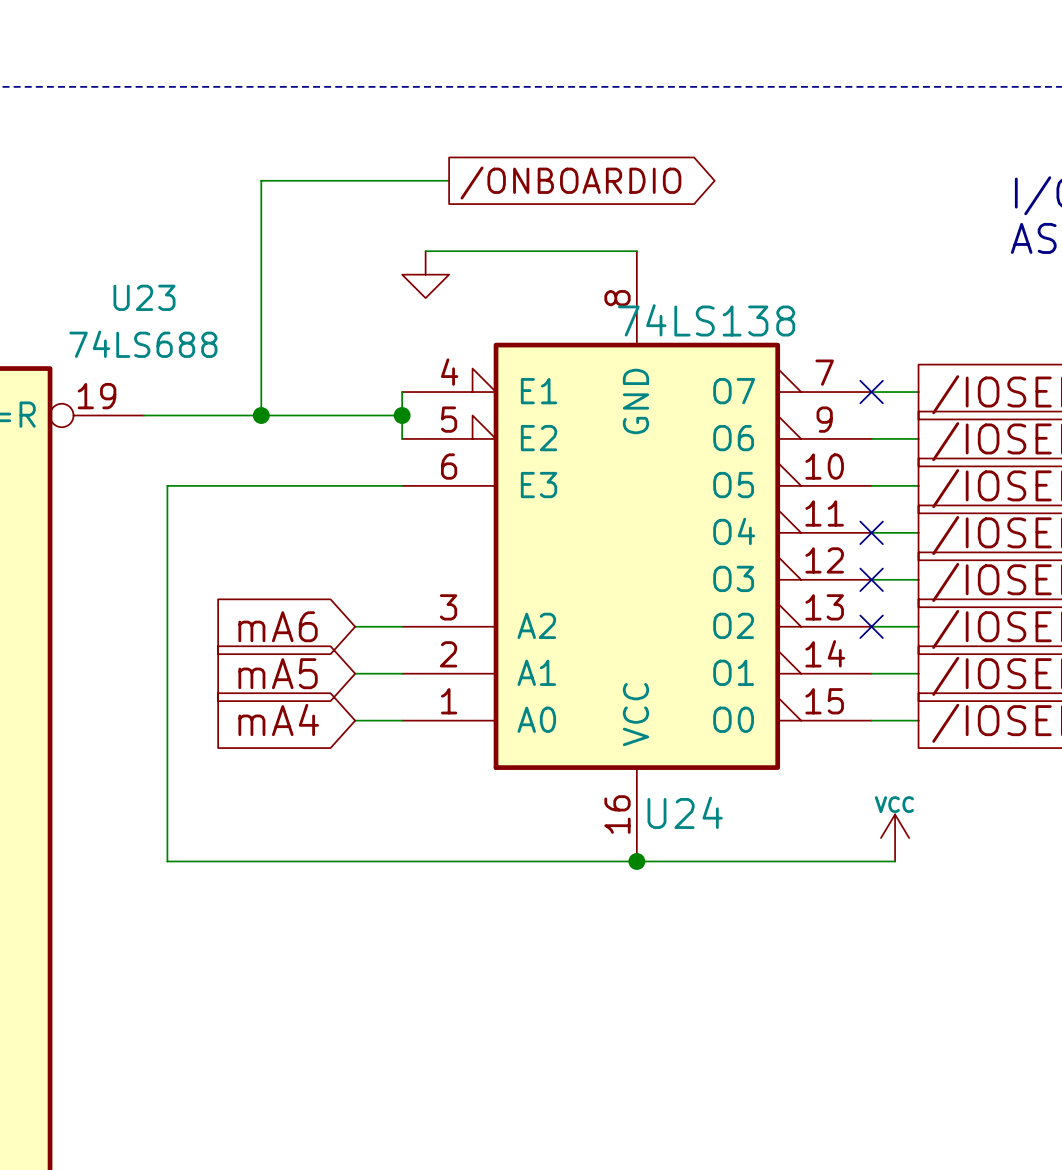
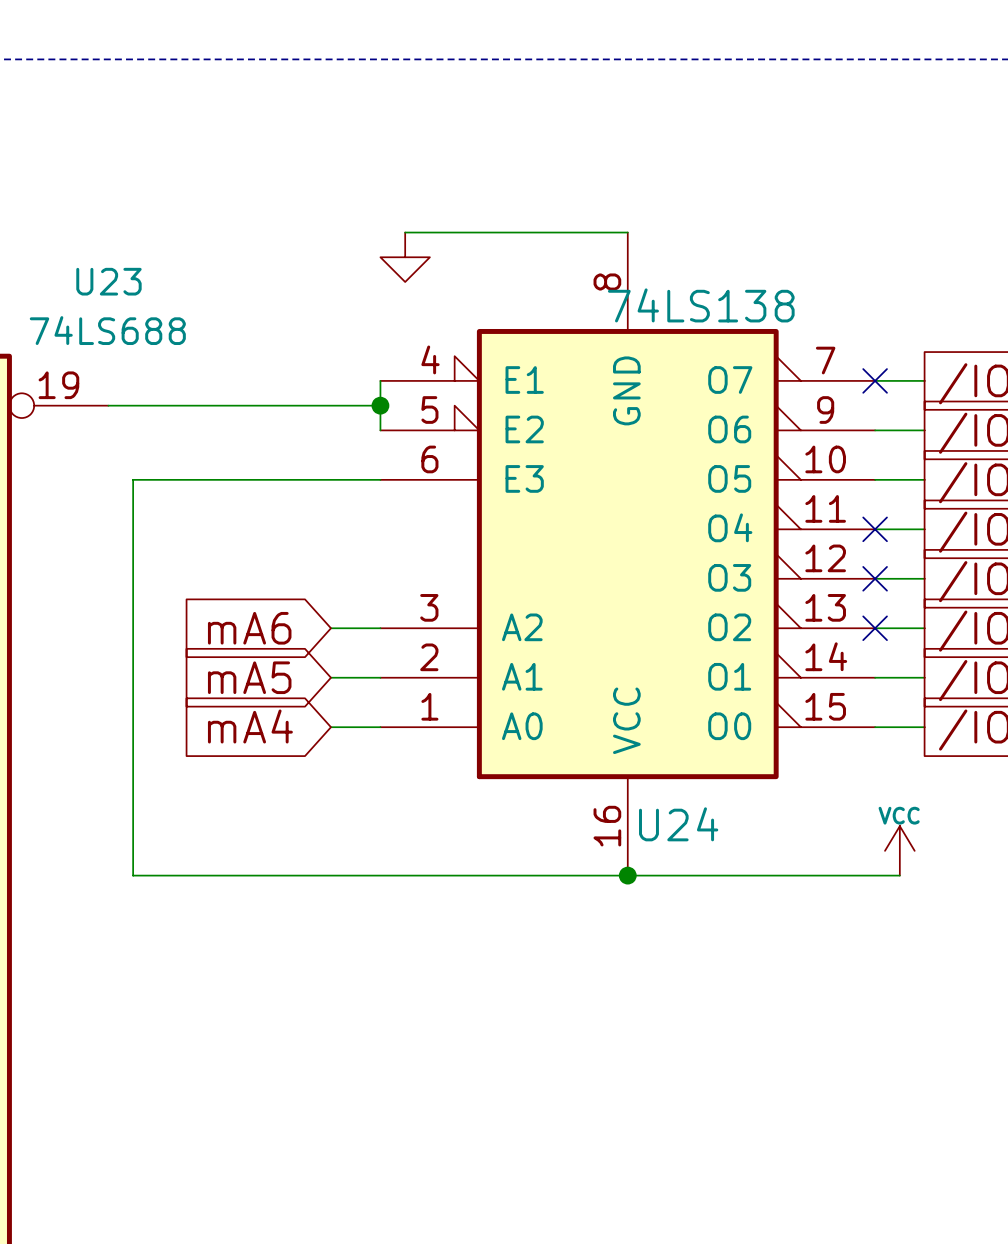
wire: (449, 180) (261, 180) (261, 415) -> none
global label: /ONBOARDIO (570, 183) -> none
junction: (261, 415) -> none

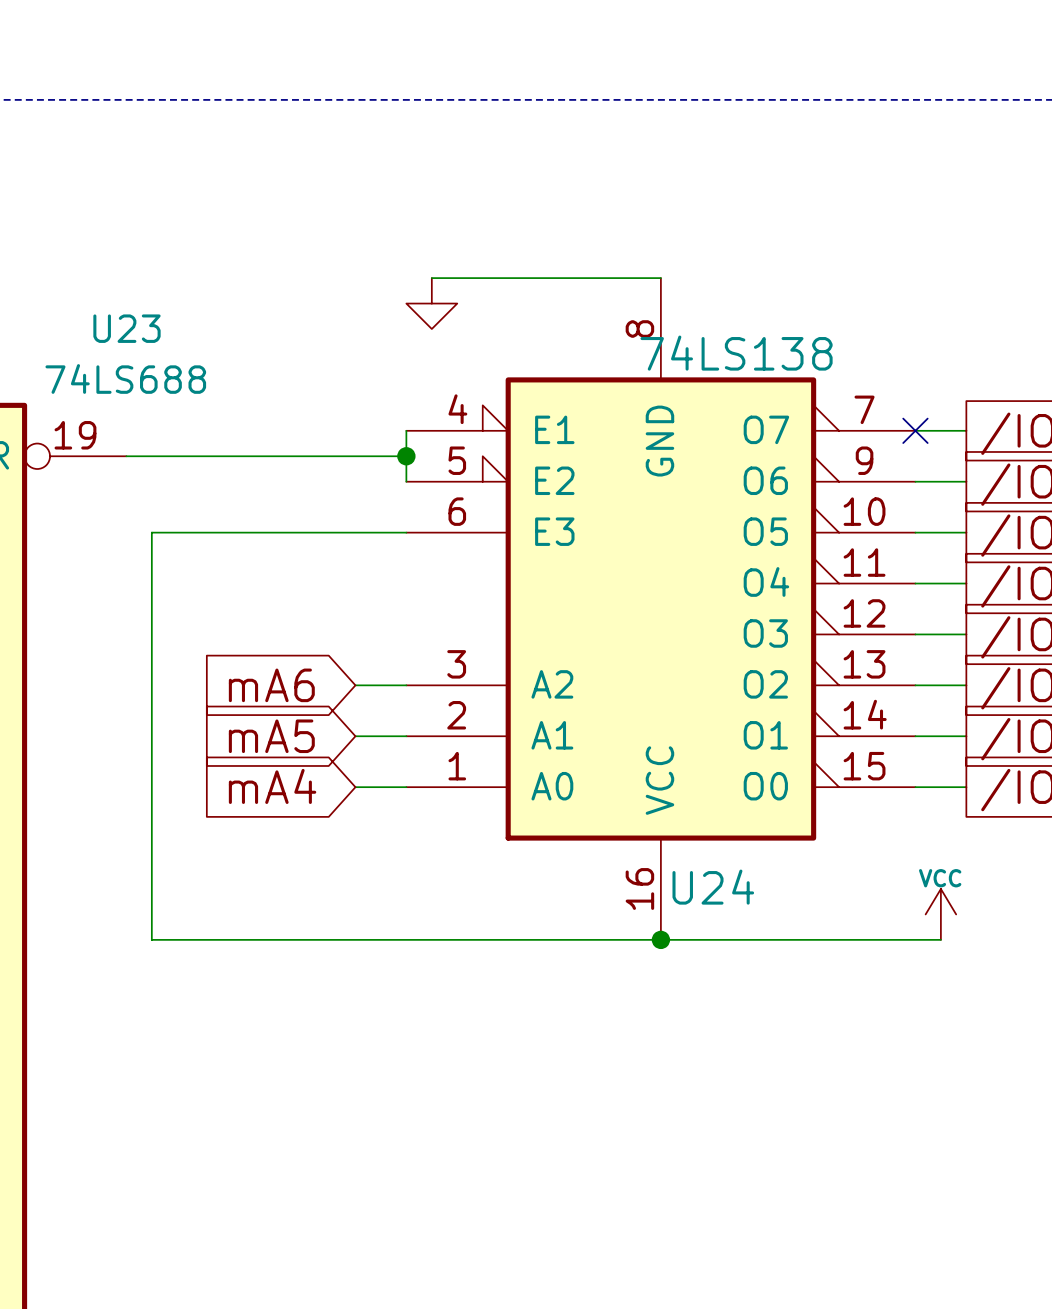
no-connect mark: (875, 529) -> none
no-connect mark: (875, 578) -> none
no-connect mark: (875, 628) -> none

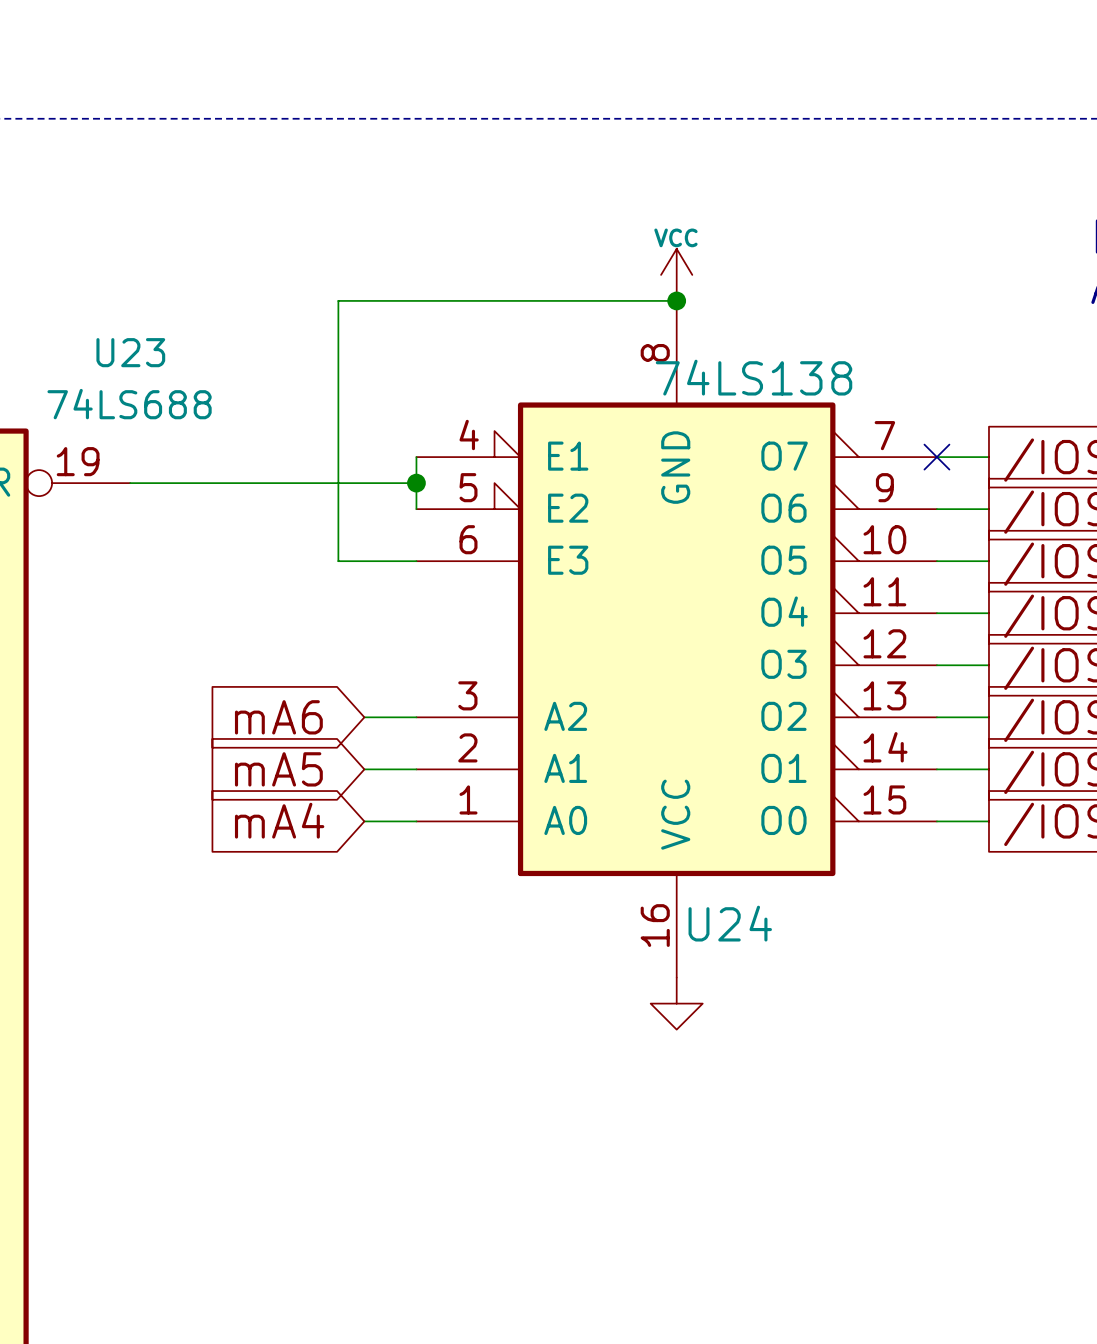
power symbol: none -> VCC (676, 274)
junction: none -> (676, 300)
power symbol: (431, 303) -> none
wire: (330, 532) (151, 532) (151, 939) (940, 939) -> (338, 561) (338, 300) (442, 300)
power symbol: VCC (940, 914) -> none
junction: (660, 939) -> none
power symbol: none -> (676, 1003)

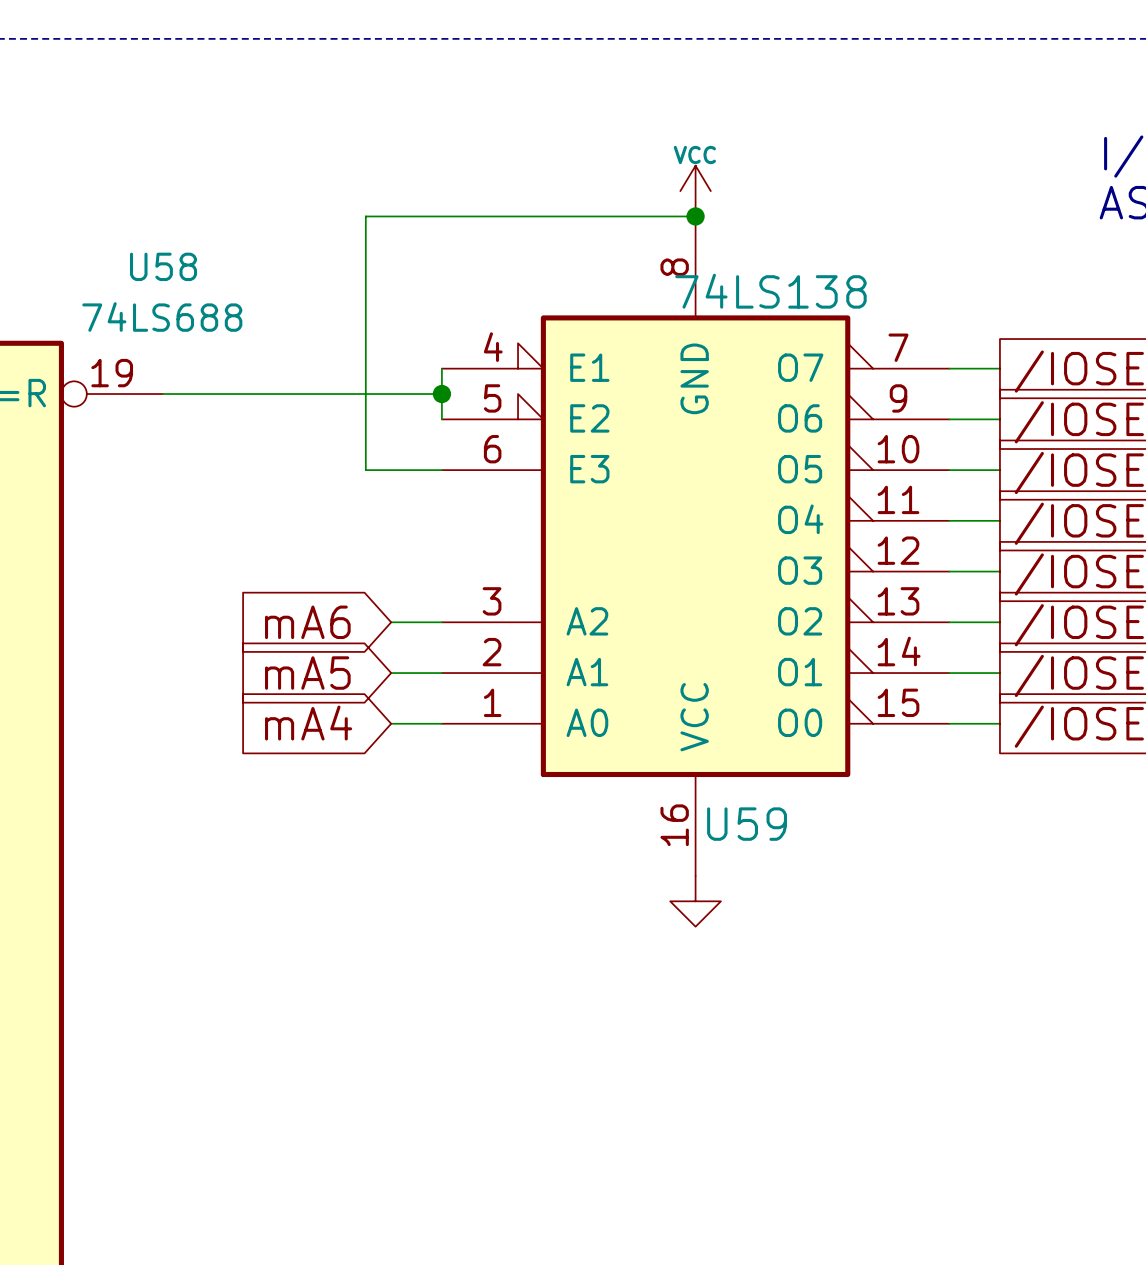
U23 name: U23 (130, 352) -> U58 (163, 266)
no-connect mark: (936, 457) -> none
U24 name: U24 (730, 923) -> U59 (747, 824)

